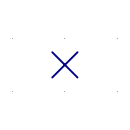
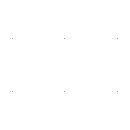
no-connect mark: (64, 64) -> none

